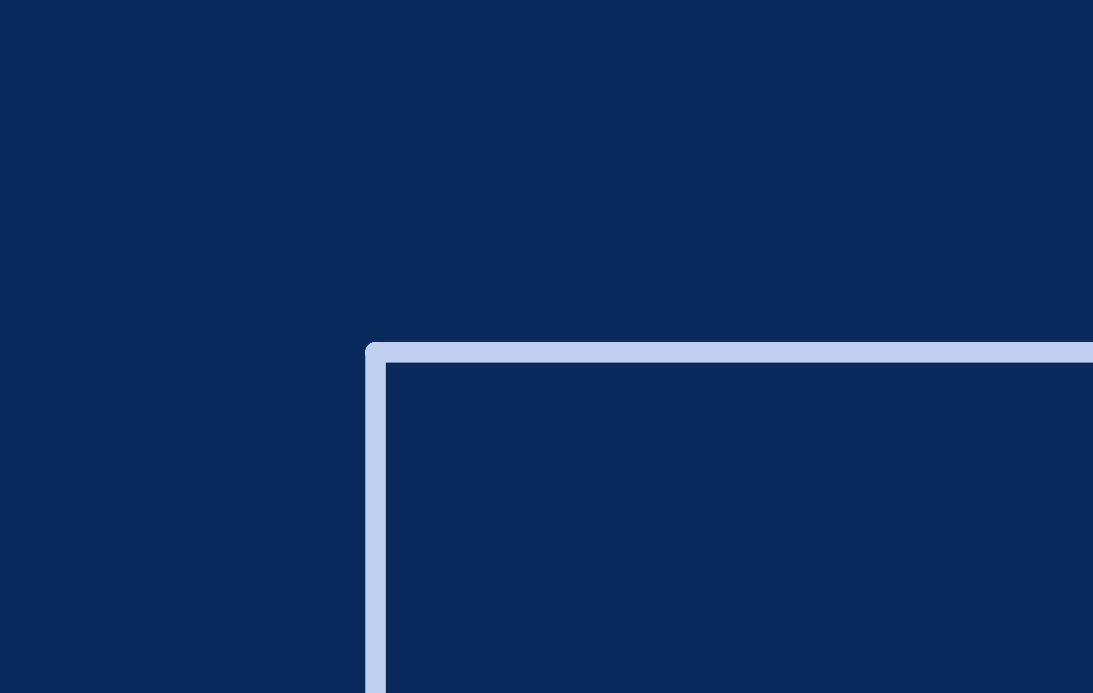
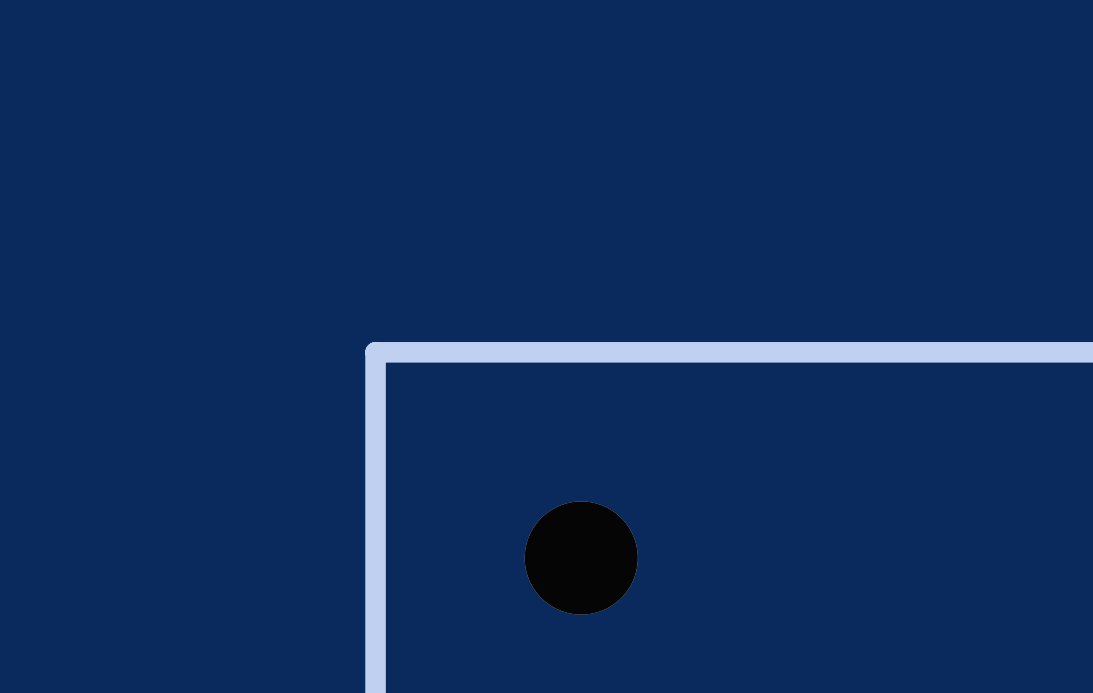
part: none -> (581, 558)

